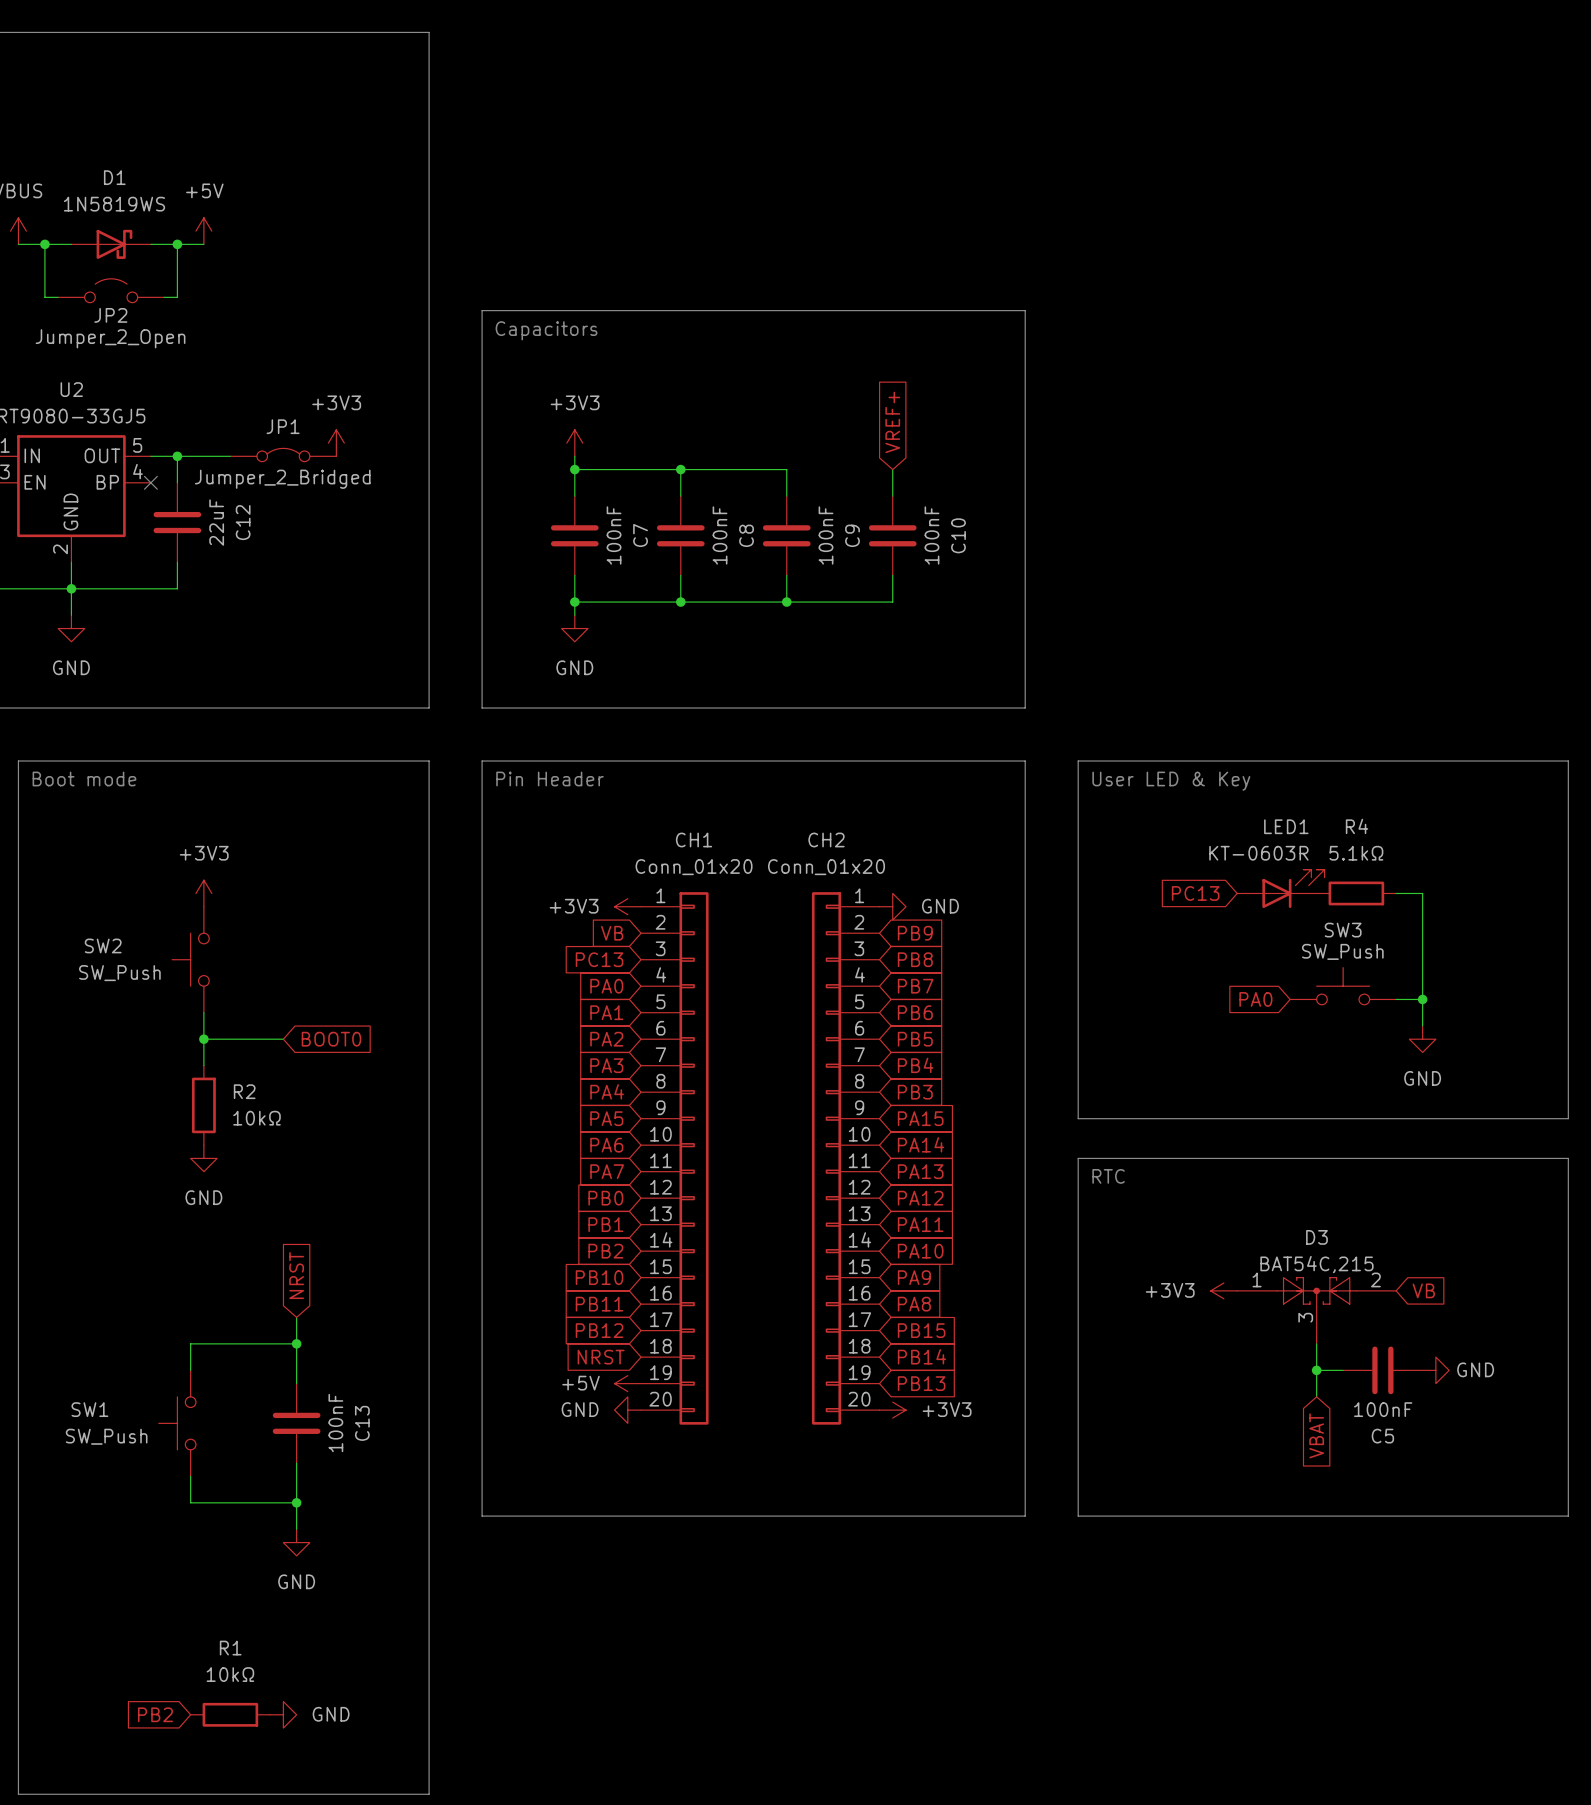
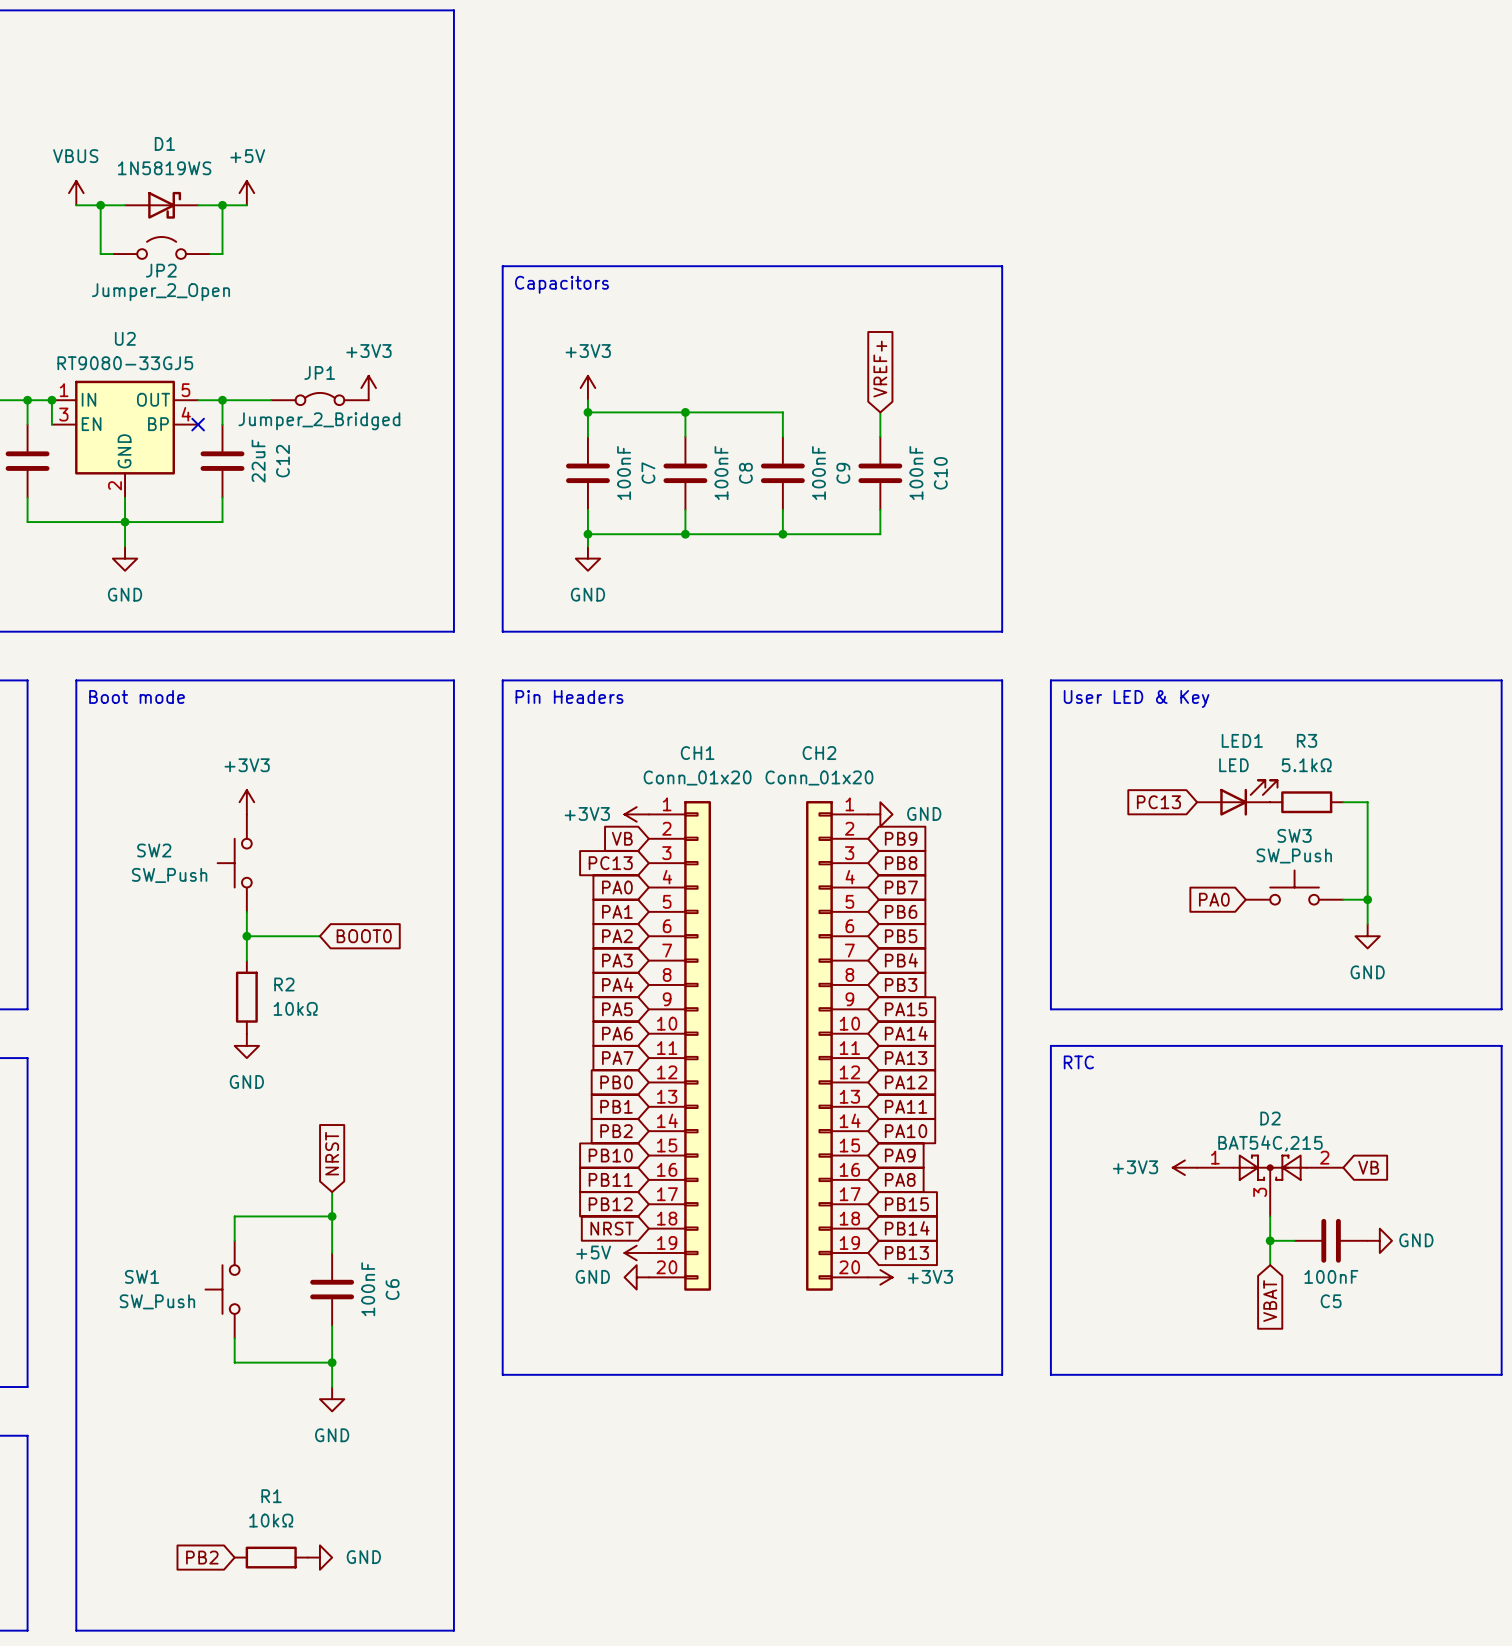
text: Pin Header (550, 778) -> Pin Headers (569, 696)
R4 name: R4 (1357, 826) -> R3 (1307, 740)
LED1 value: KT-0603R (1258, 853) -> LED (1233, 765)
D3 name: D3 (1316, 1237) -> D2 (1270, 1118)
C13 name: C13 (362, 1423) -> C6 (392, 1289)

